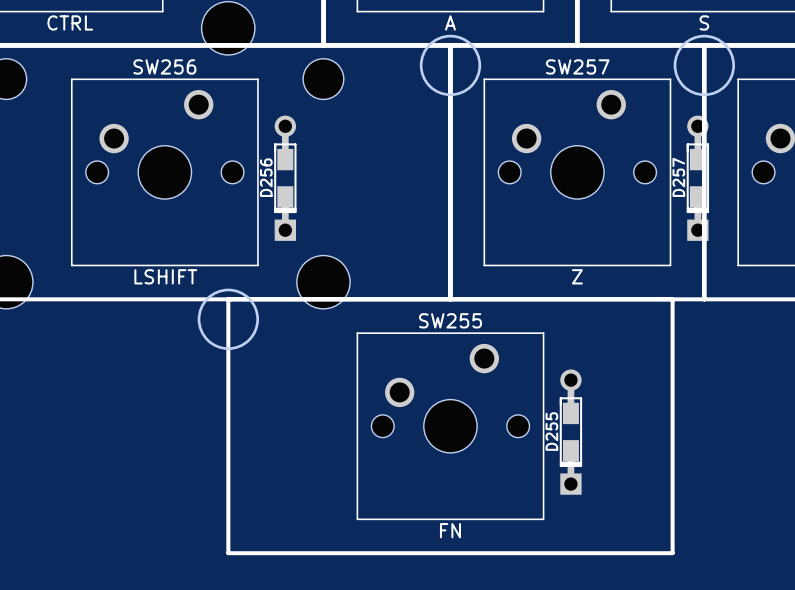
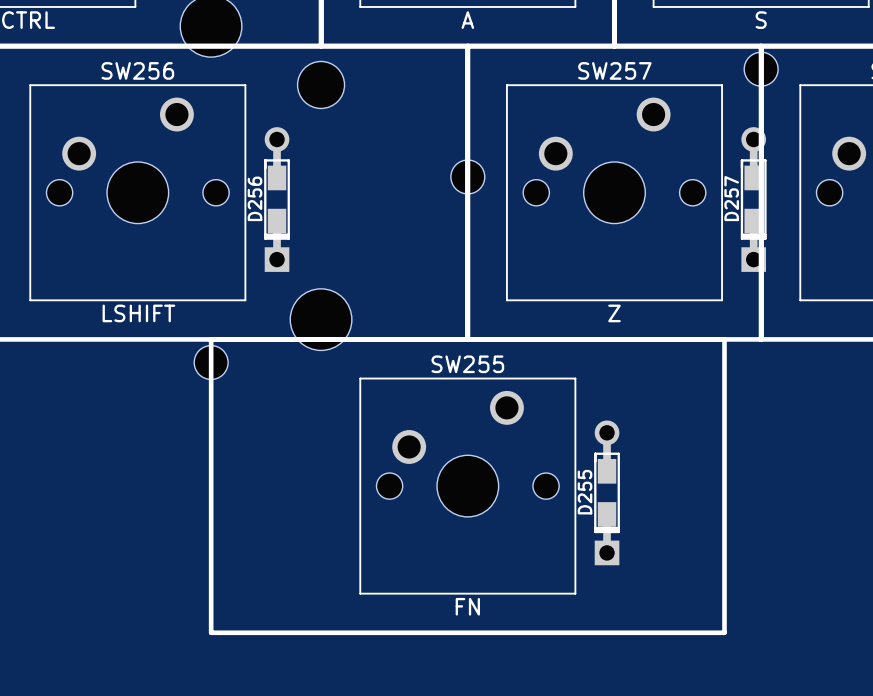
round board edge: [419, 34, 482, 97] -> none
round board edge: [673, 34, 735, 97] -> none
part: none -> (761, 69)
part: none -> (467, 176)
round board edge: [197, 288, 259, 350] -> none
part: none -> (211, 362)

